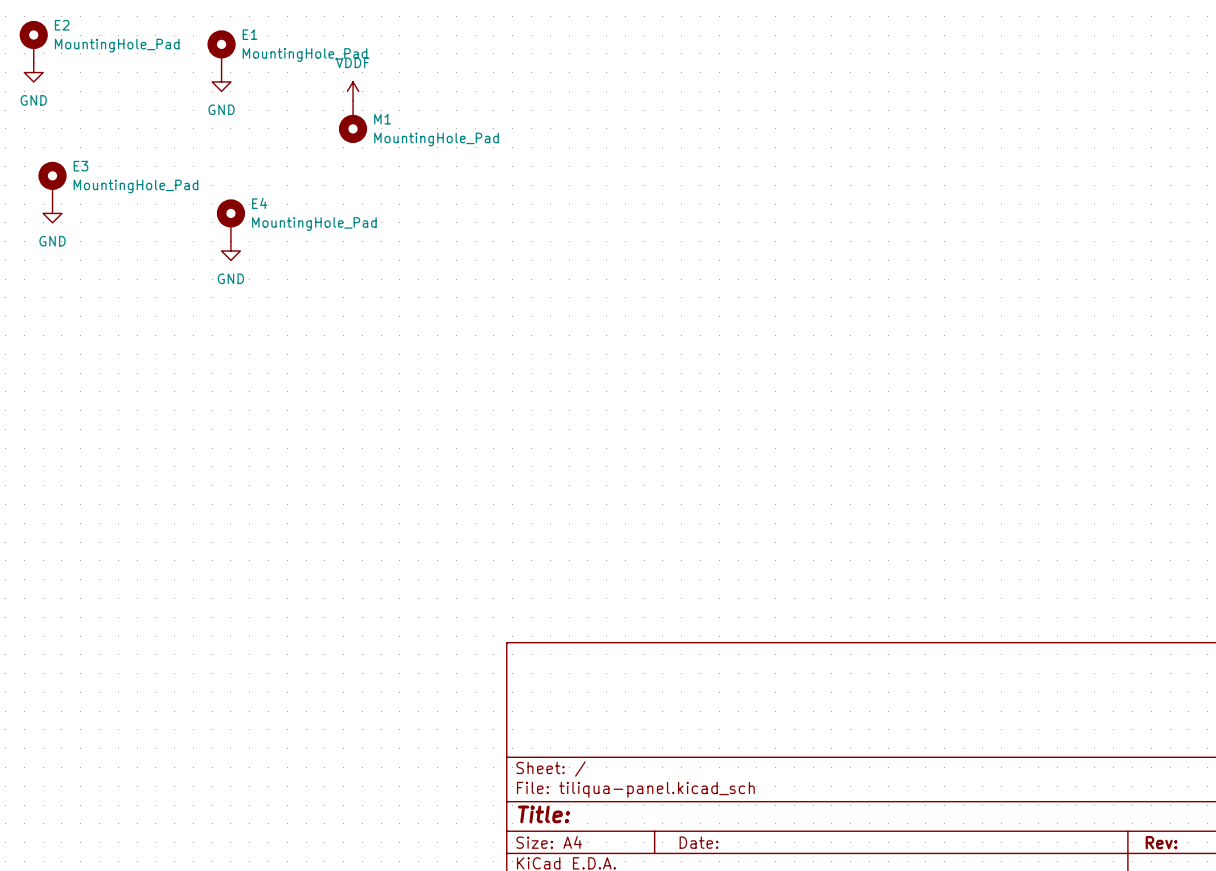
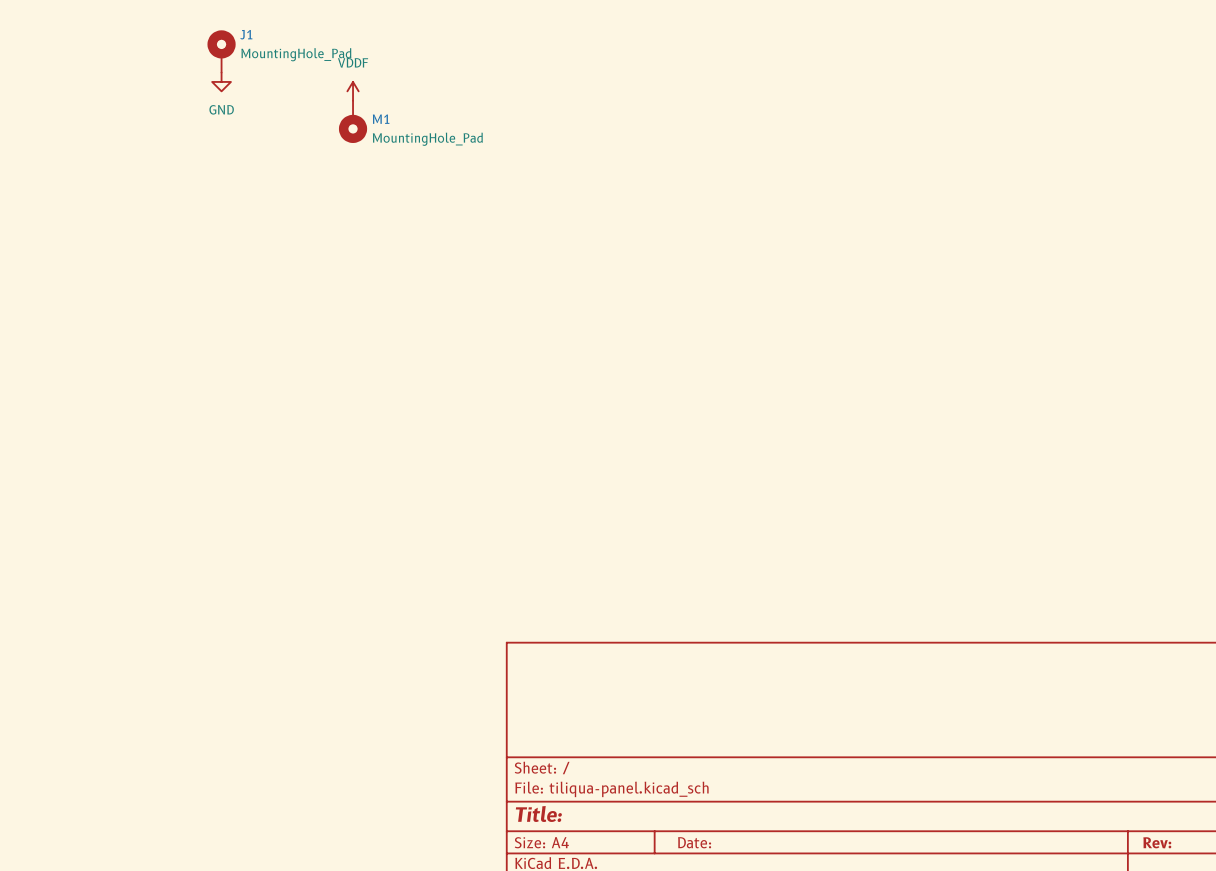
E1 name: E1 (250, 34) -> J1 (246, 34)
E2: MountingHole_Pad (33, 42) -> none
power symbol: GND (33, 72) -> none
E3: MountingHole_Pad (52, 182) -> none
power symbol: GND (52, 213) -> none
E4: MountingHole_Pad (230, 220) -> none
power symbol: GND (230, 250) -> none

